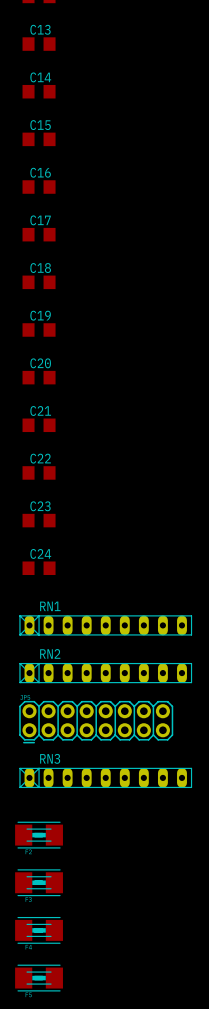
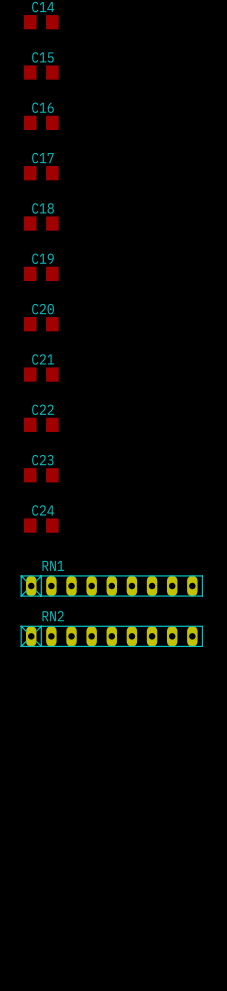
part: (96, 722) -> none
RN3: (105, 777) -> none
part: (39, 835) -> none
part: (39, 882) -> none
part: (39, 930) -> none
part: (39, 978) -> none

